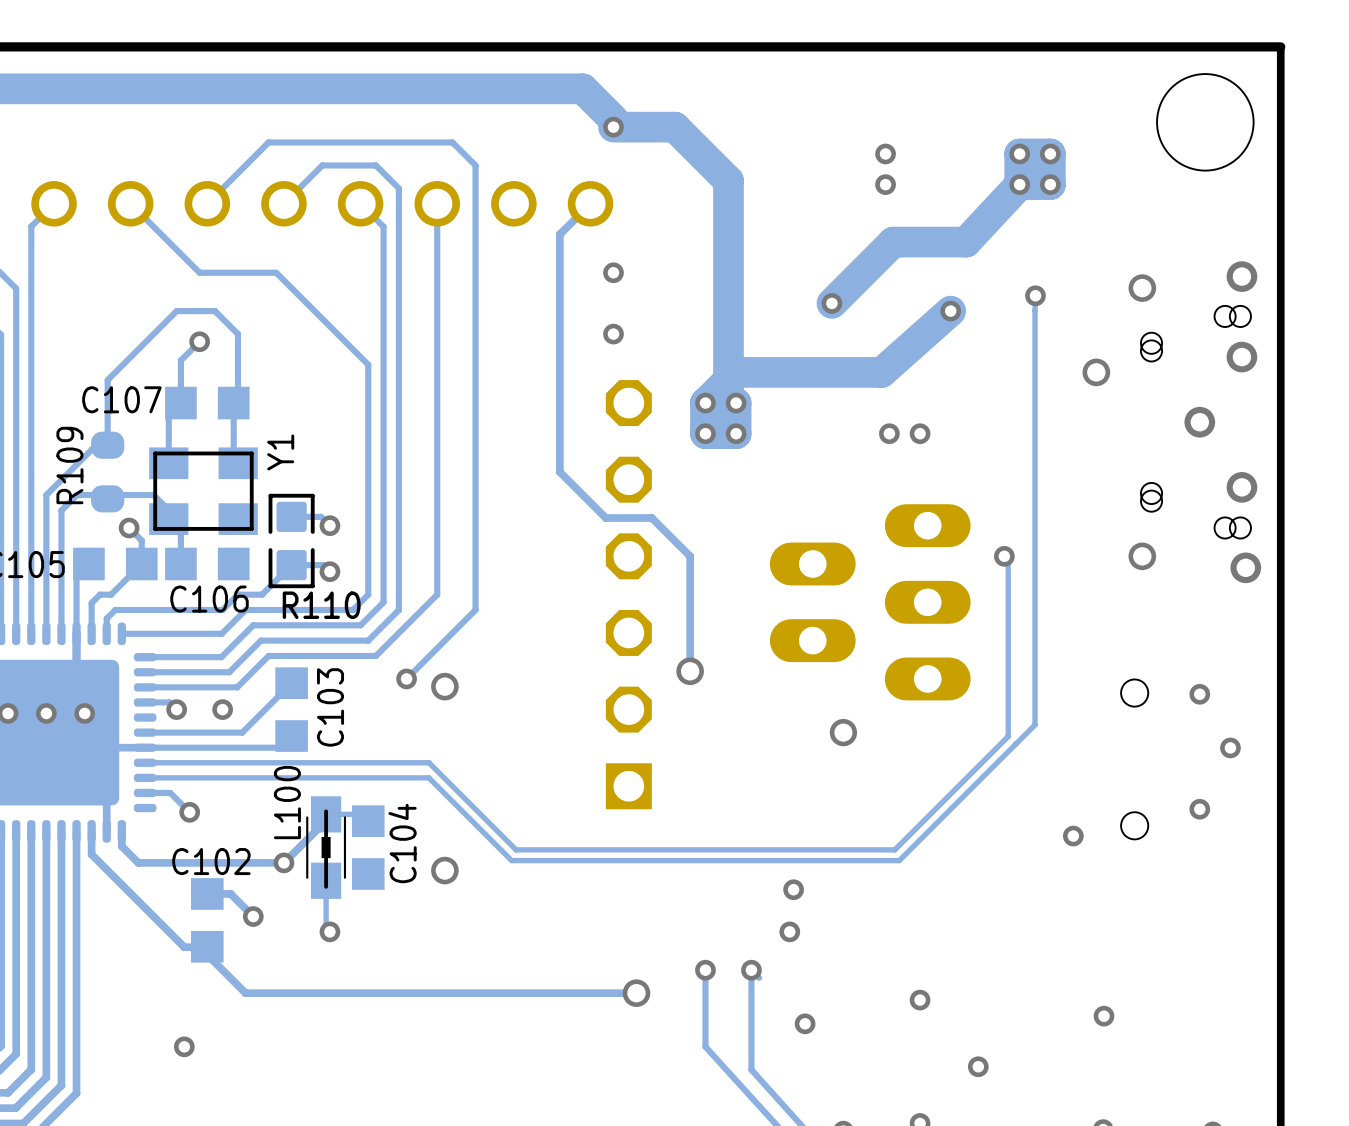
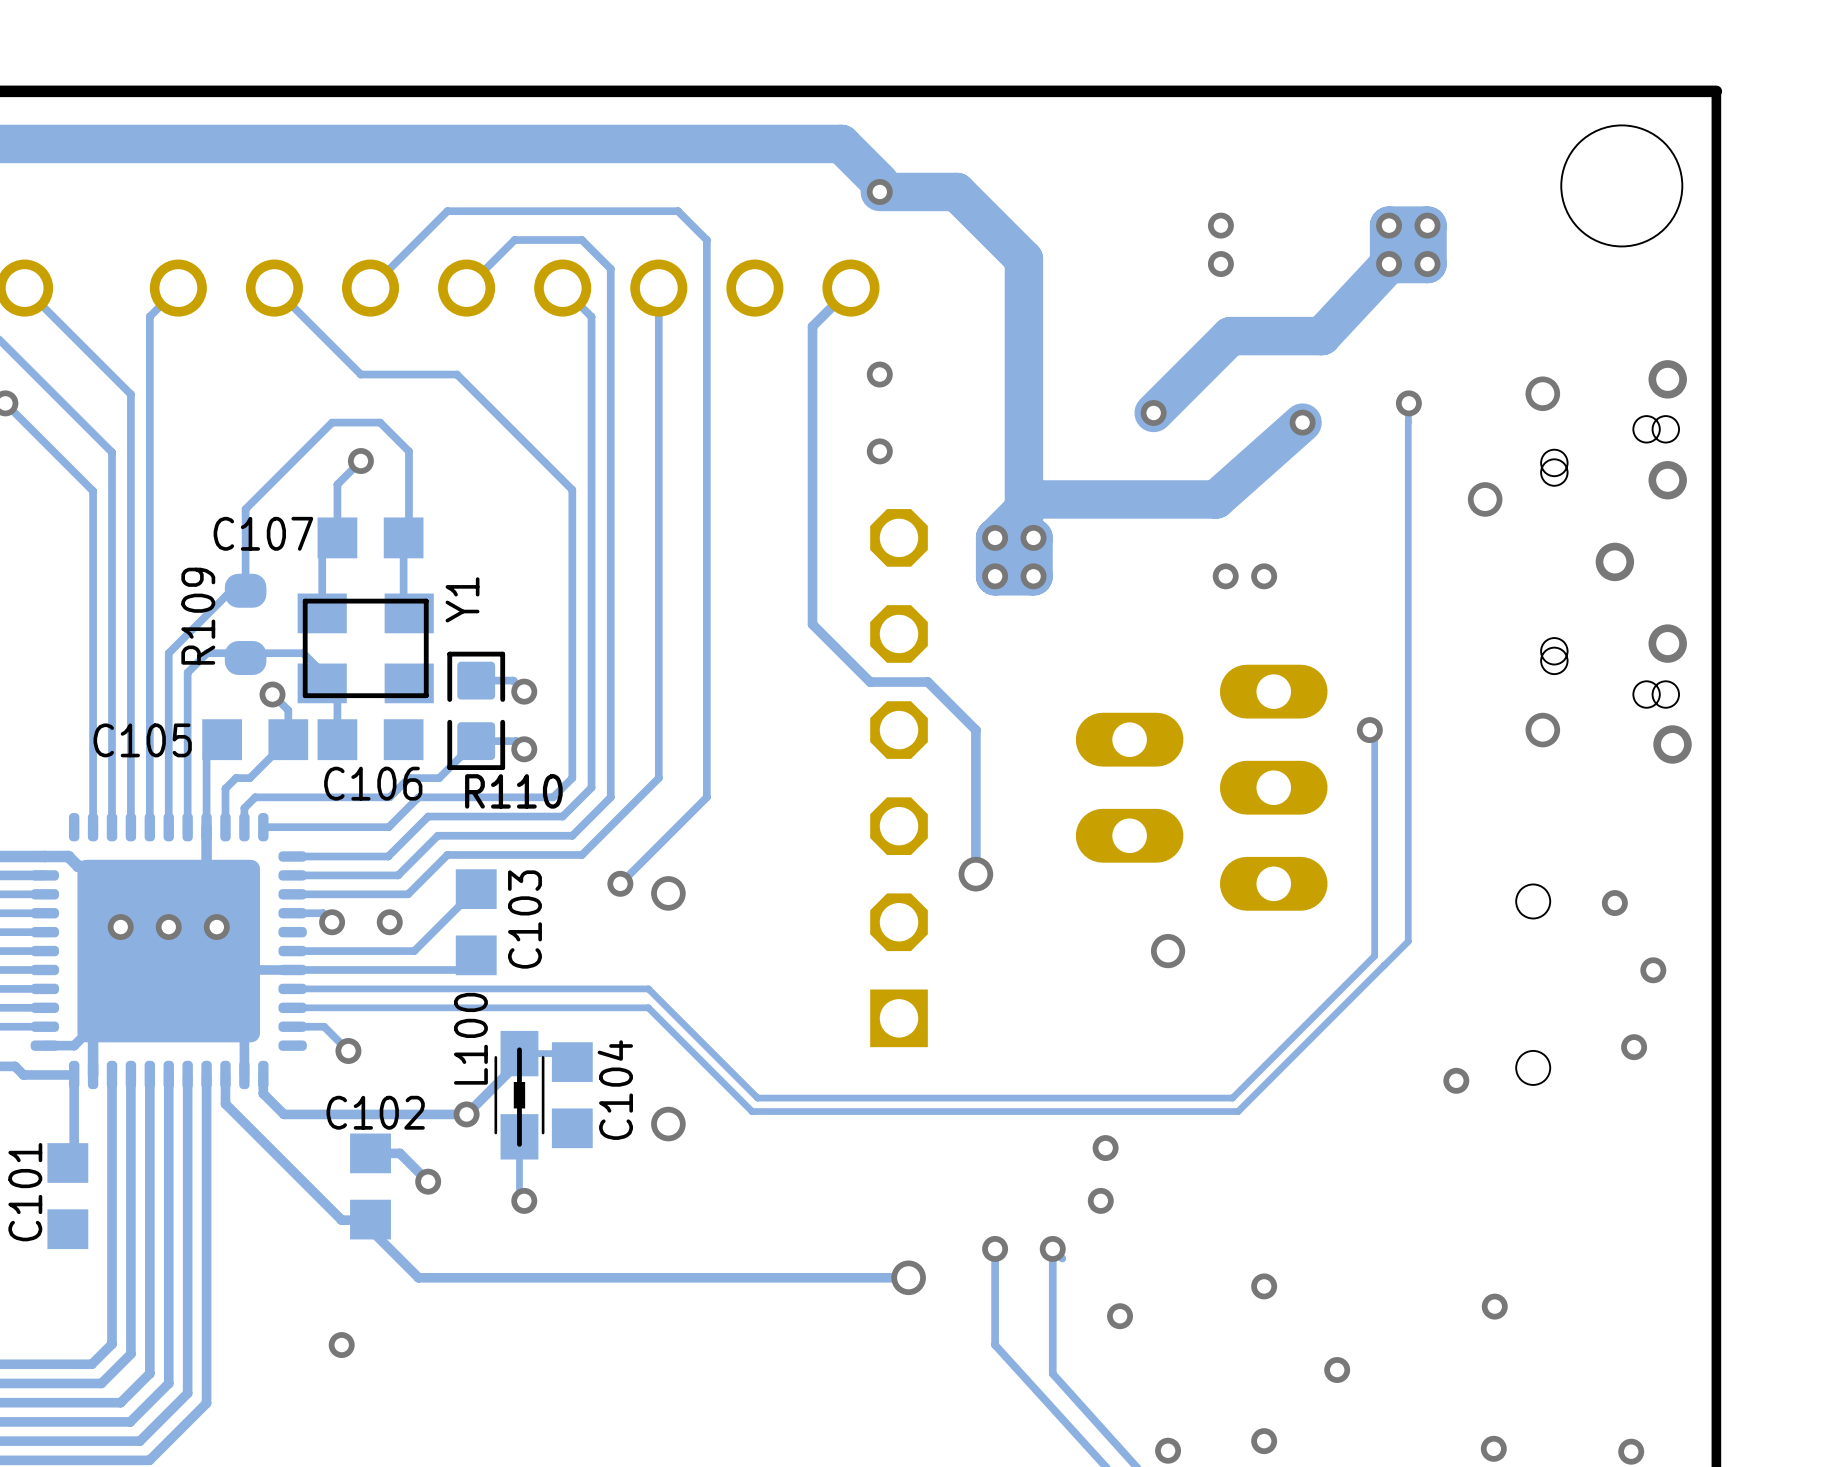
via position: (1199, 809) -> (1634, 1047)

